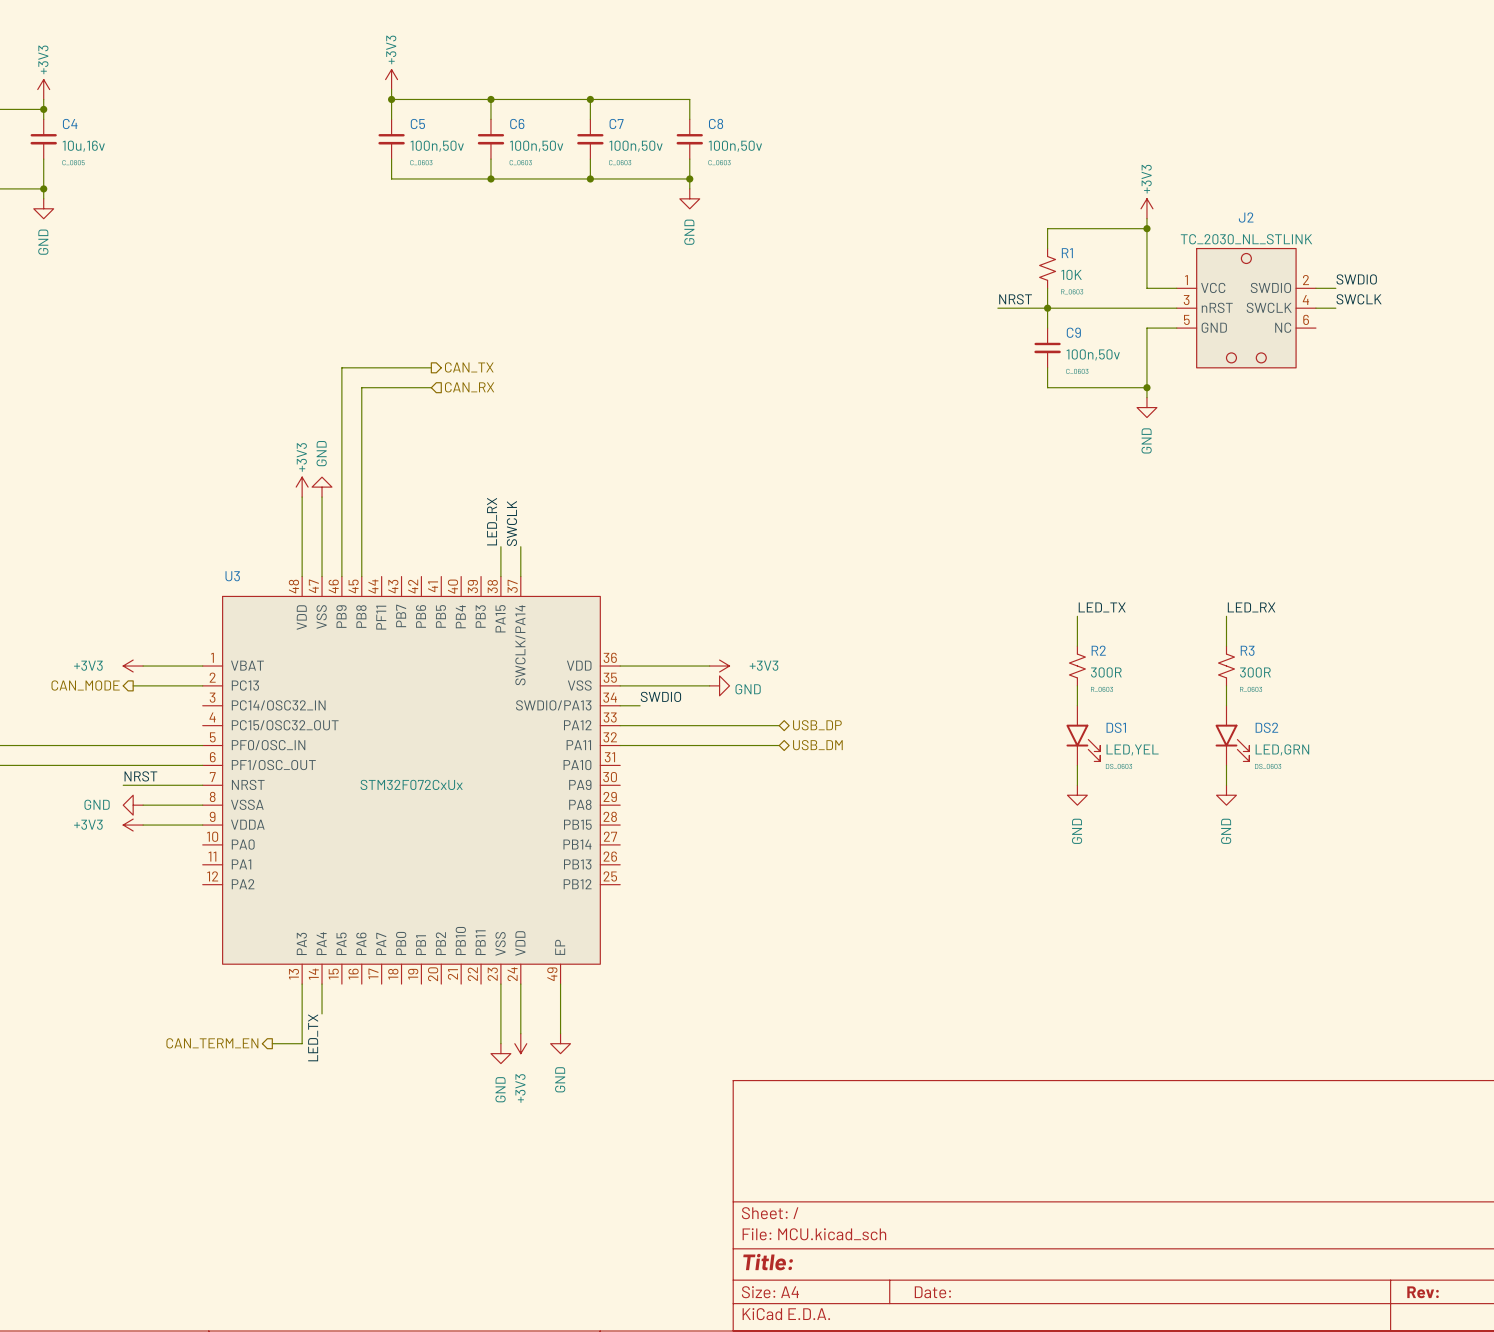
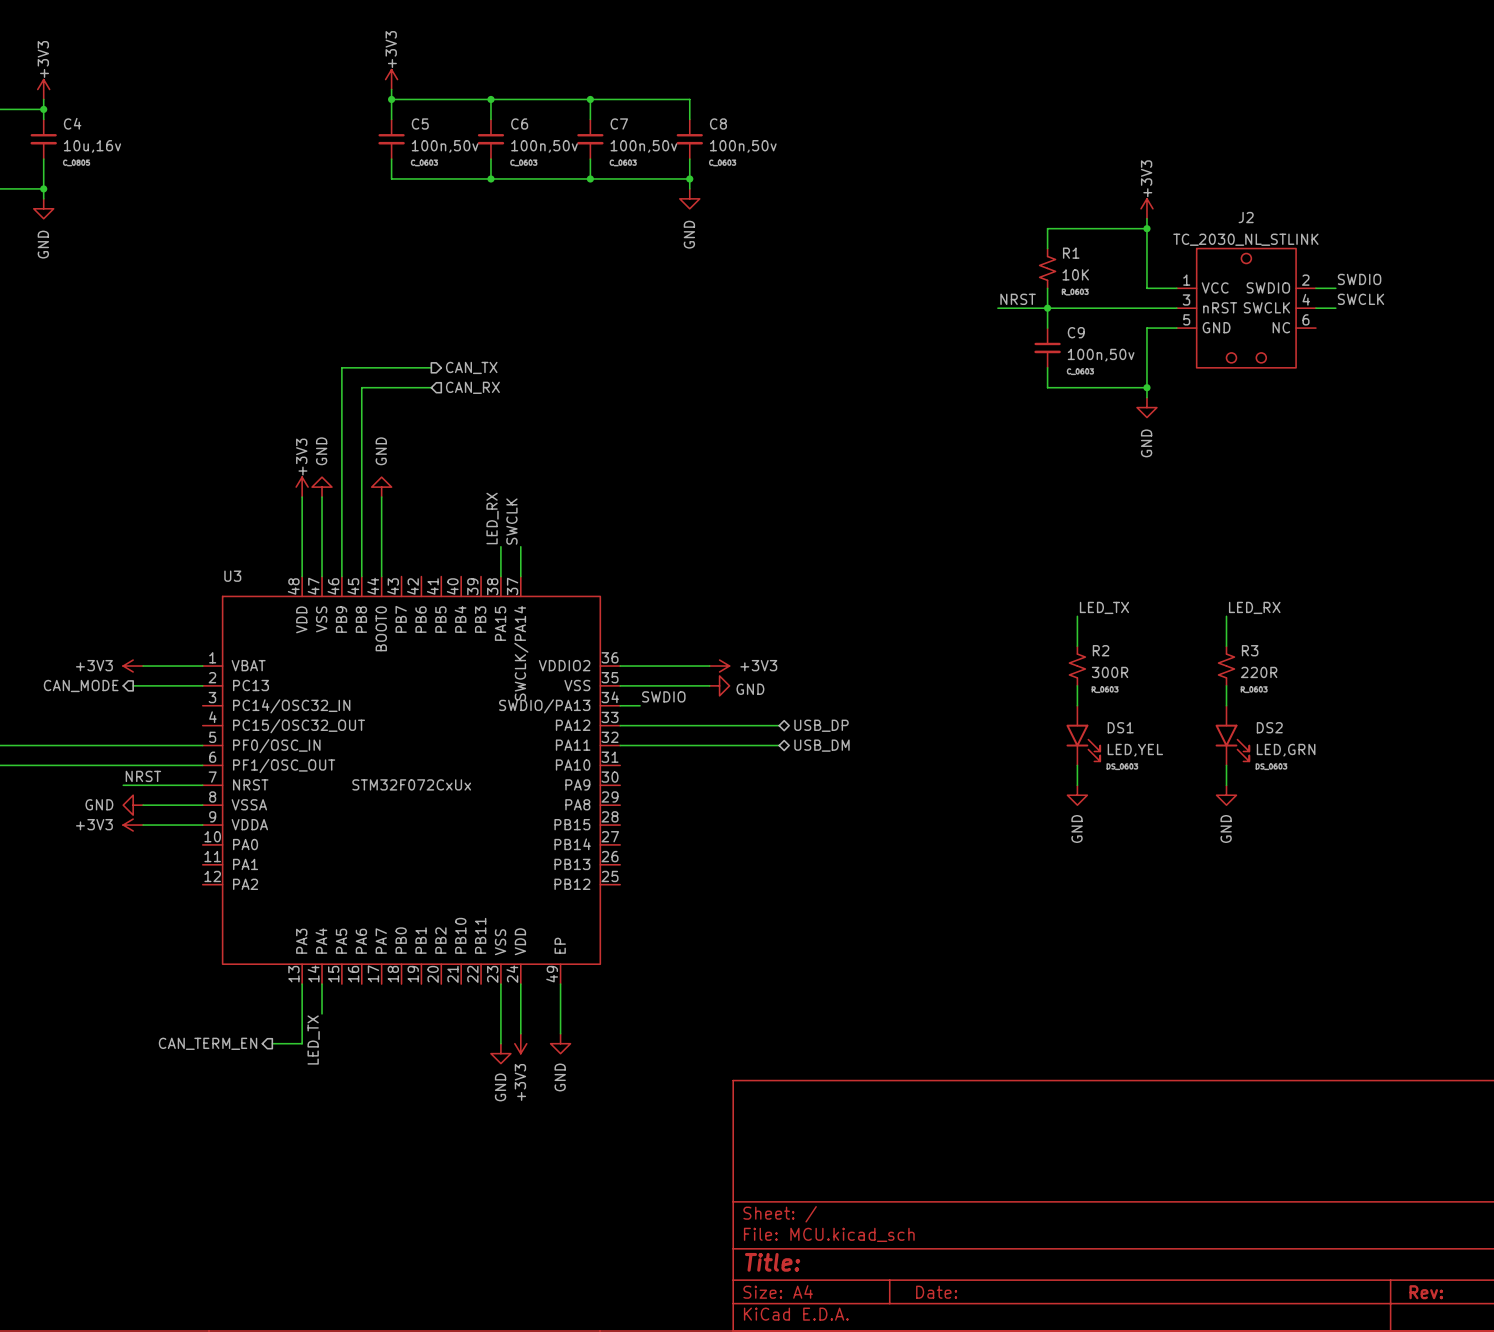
power symbol: none -> GND (381, 487)
wire: none -> (381, 497) (381, 576)
U3 pin name: PF11 (381, 617) -> BOOT0 (381, 628)
U3 pin name: VDD (579, 665) -> VDDIO2 (564, 665)
R3 value: 300R (1255, 672) -> 220R (1259, 672)

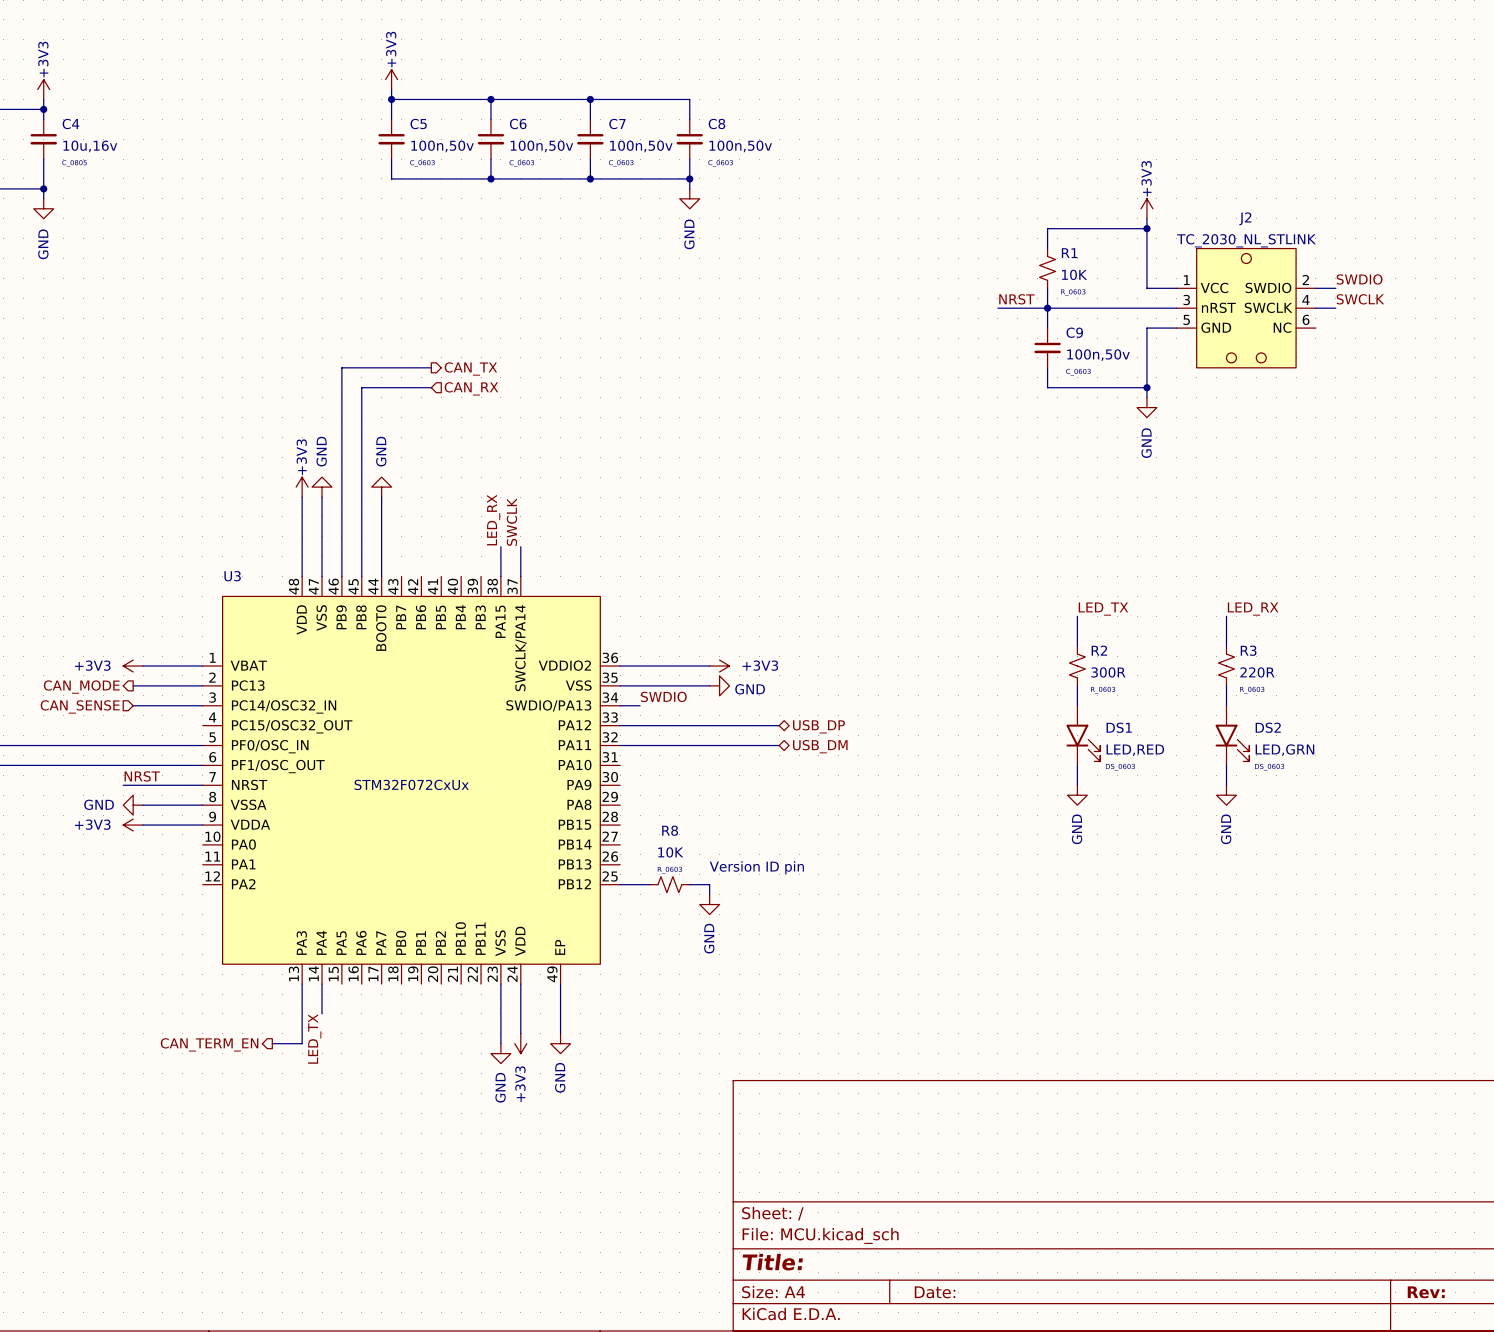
hierarchical label: none -> CAN_SENSE (80, 706)
wire: none -> (133, 705) (202, 705)
DS1 value: LED,YEL (1135, 750) -> LED,RED (1135, 750)
text: none -> Version ID pin (756, 867)
wire: none -> (620, 884) (650, 884)
R8: none -> 10K (669, 884)
wire: none -> (689, 884) (709, 884) (709, 894)
power symbol: none -> GND (709, 904)

